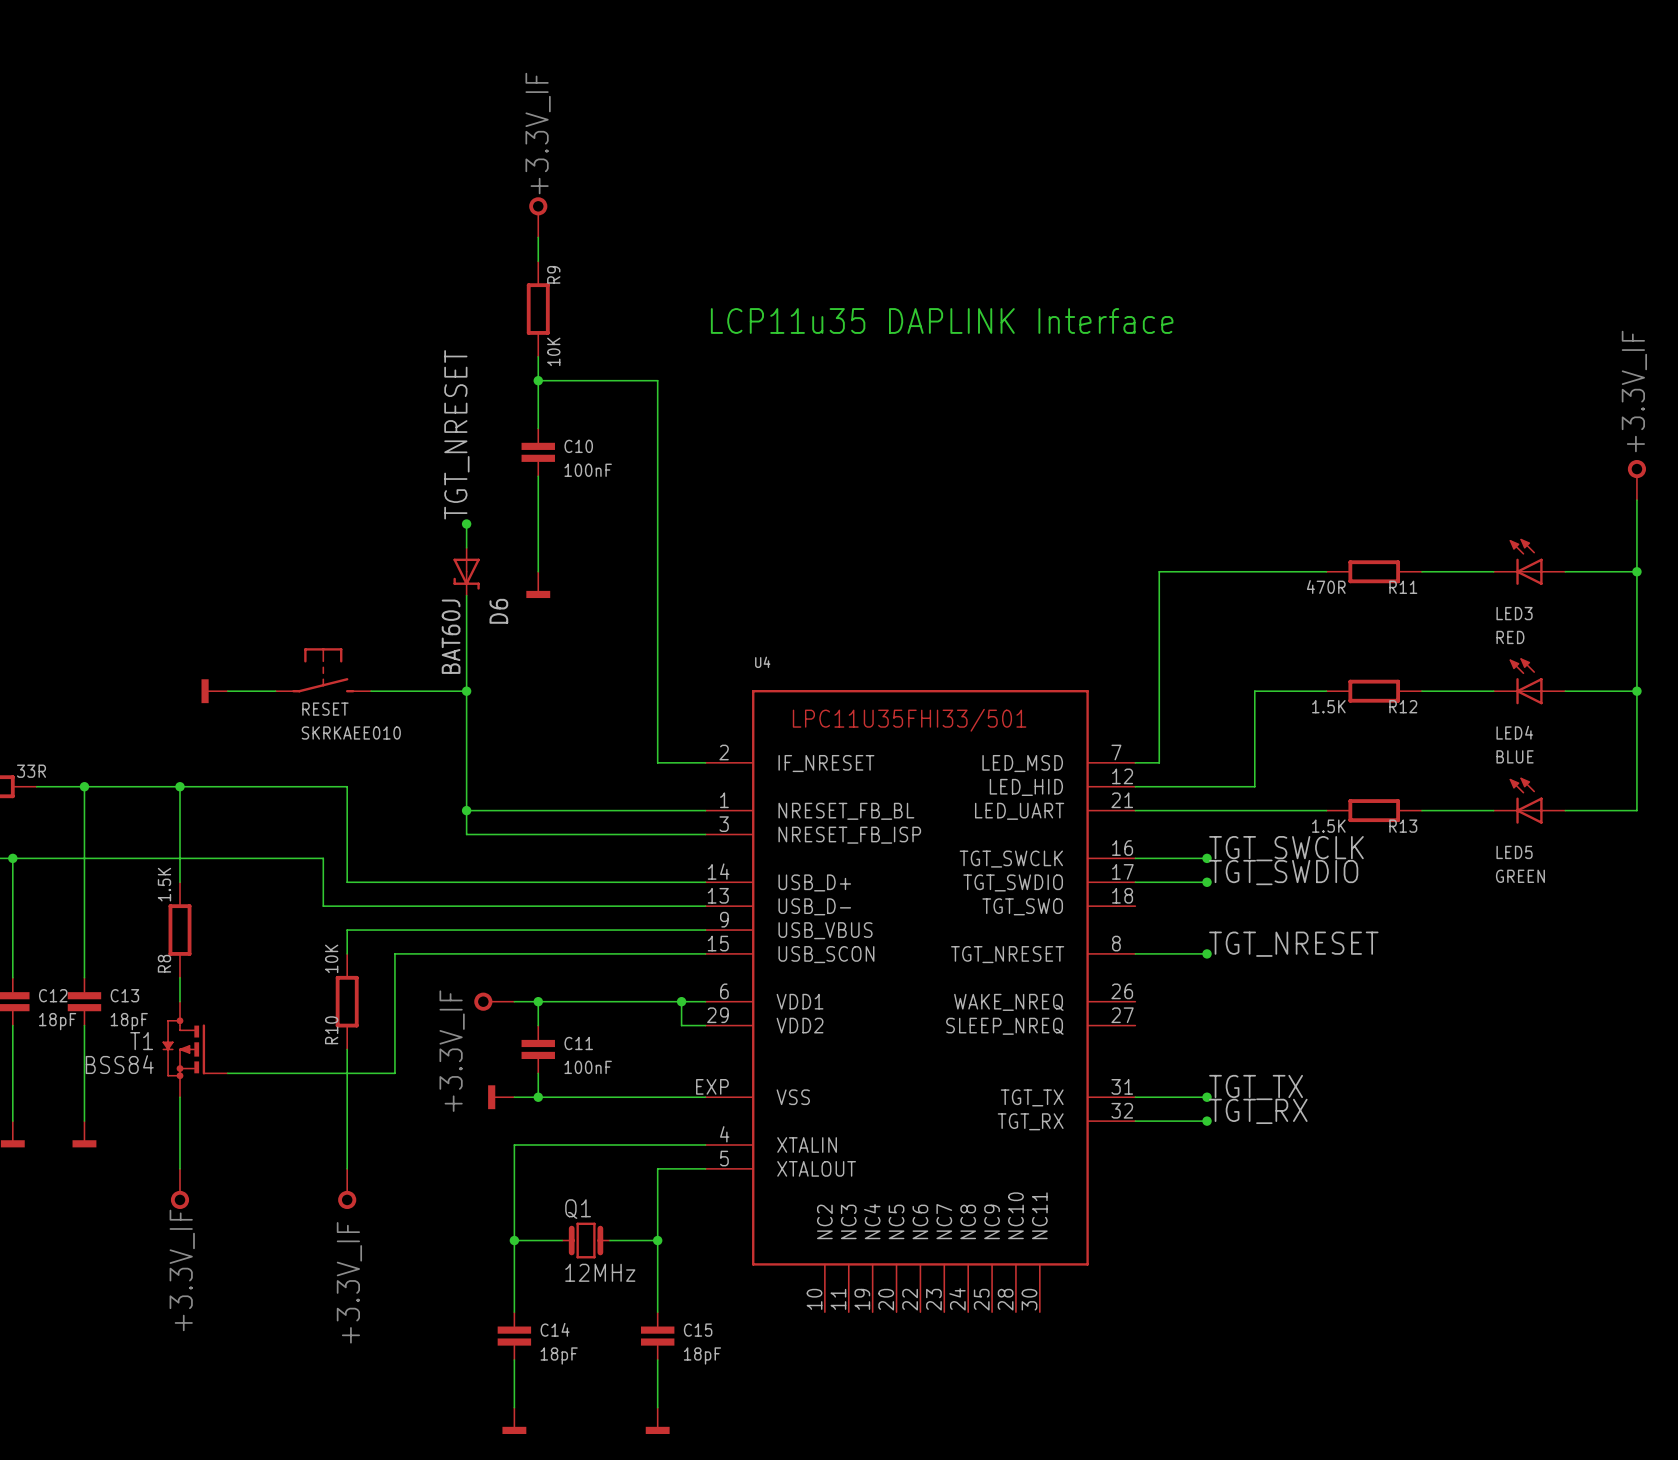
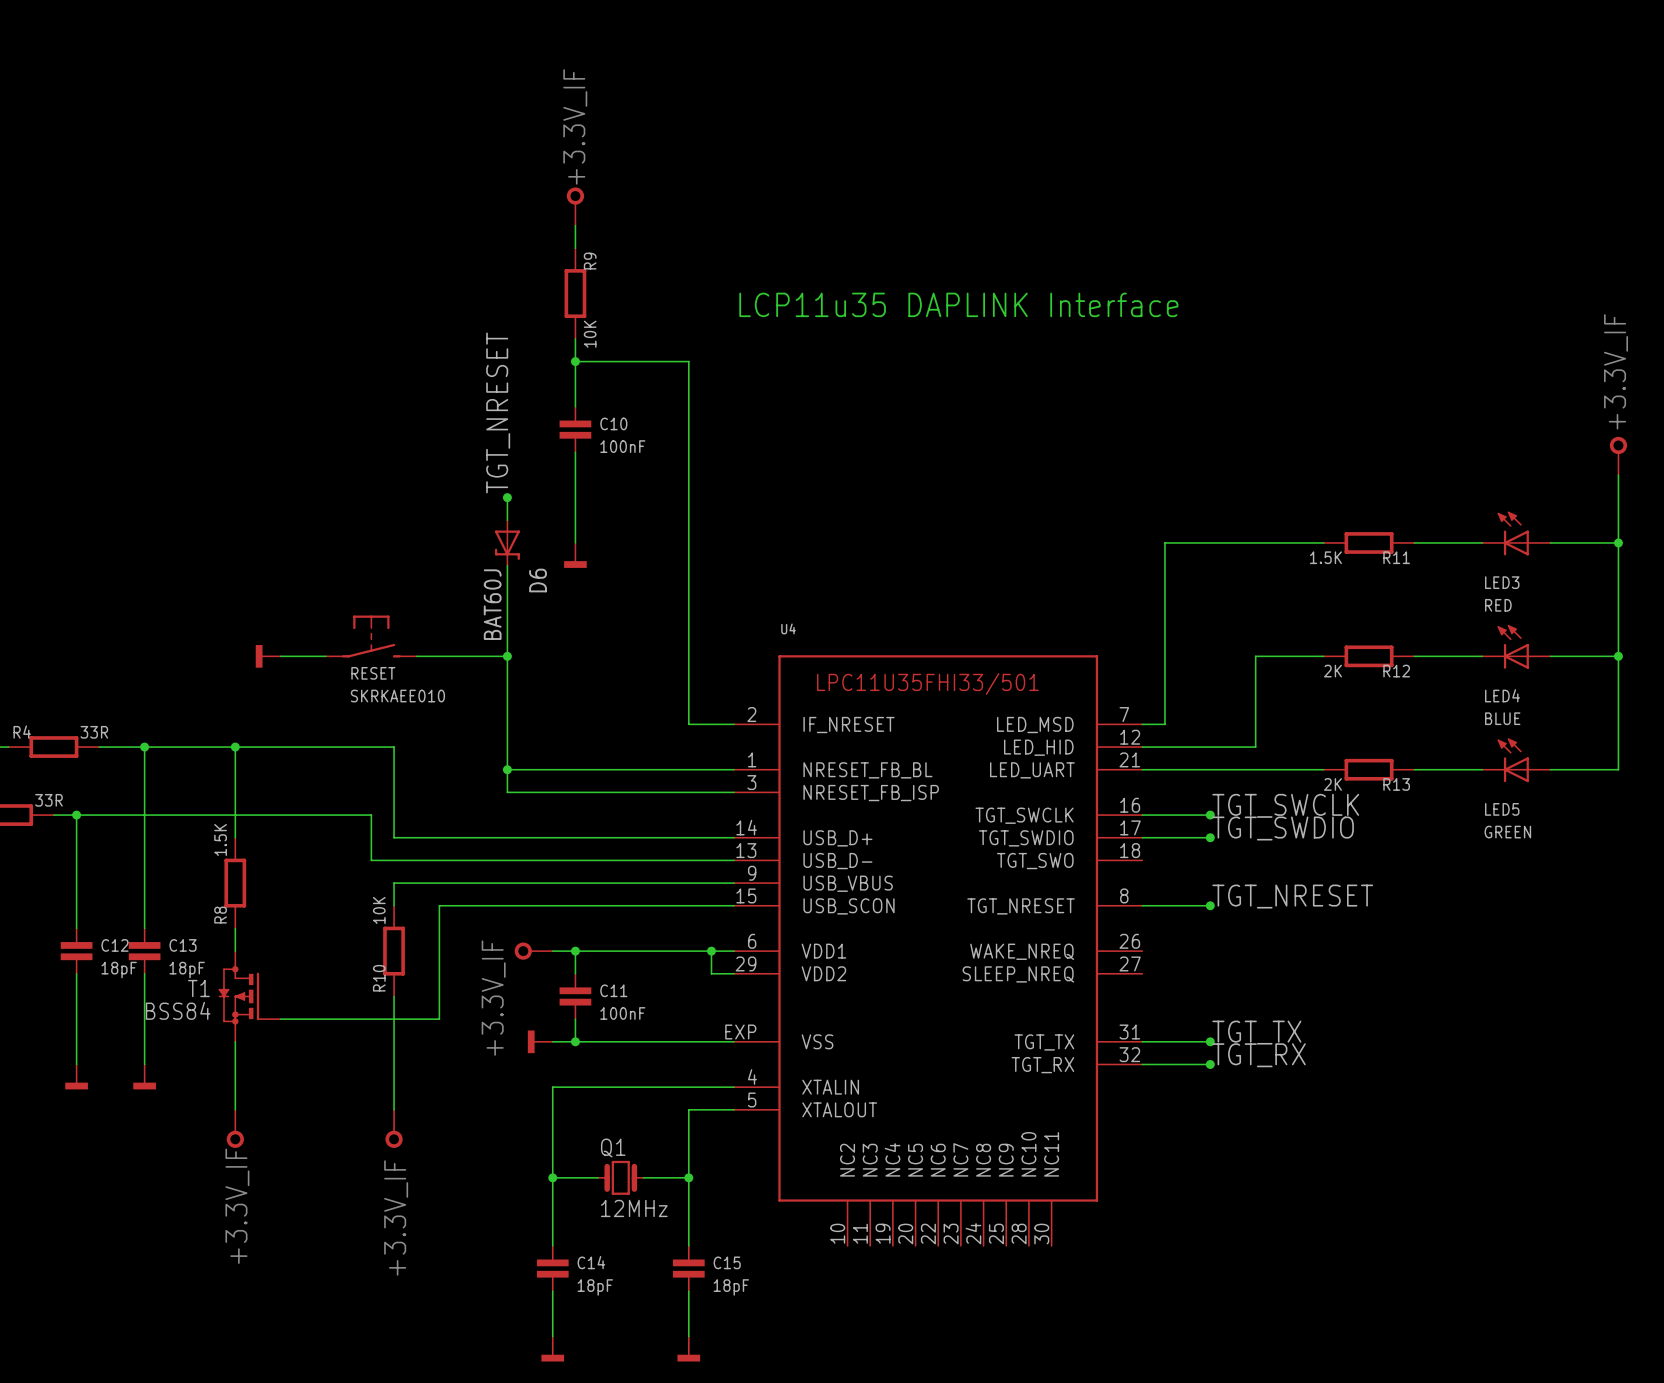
R11 value: 470R (1326, 587) -> 1.5K (1325, 557)
R12 value: 1.5K (1328, 706) -> 2K (1332, 671)
R13 value: 1.5K (1328, 826) -> 2K (1332, 784)

